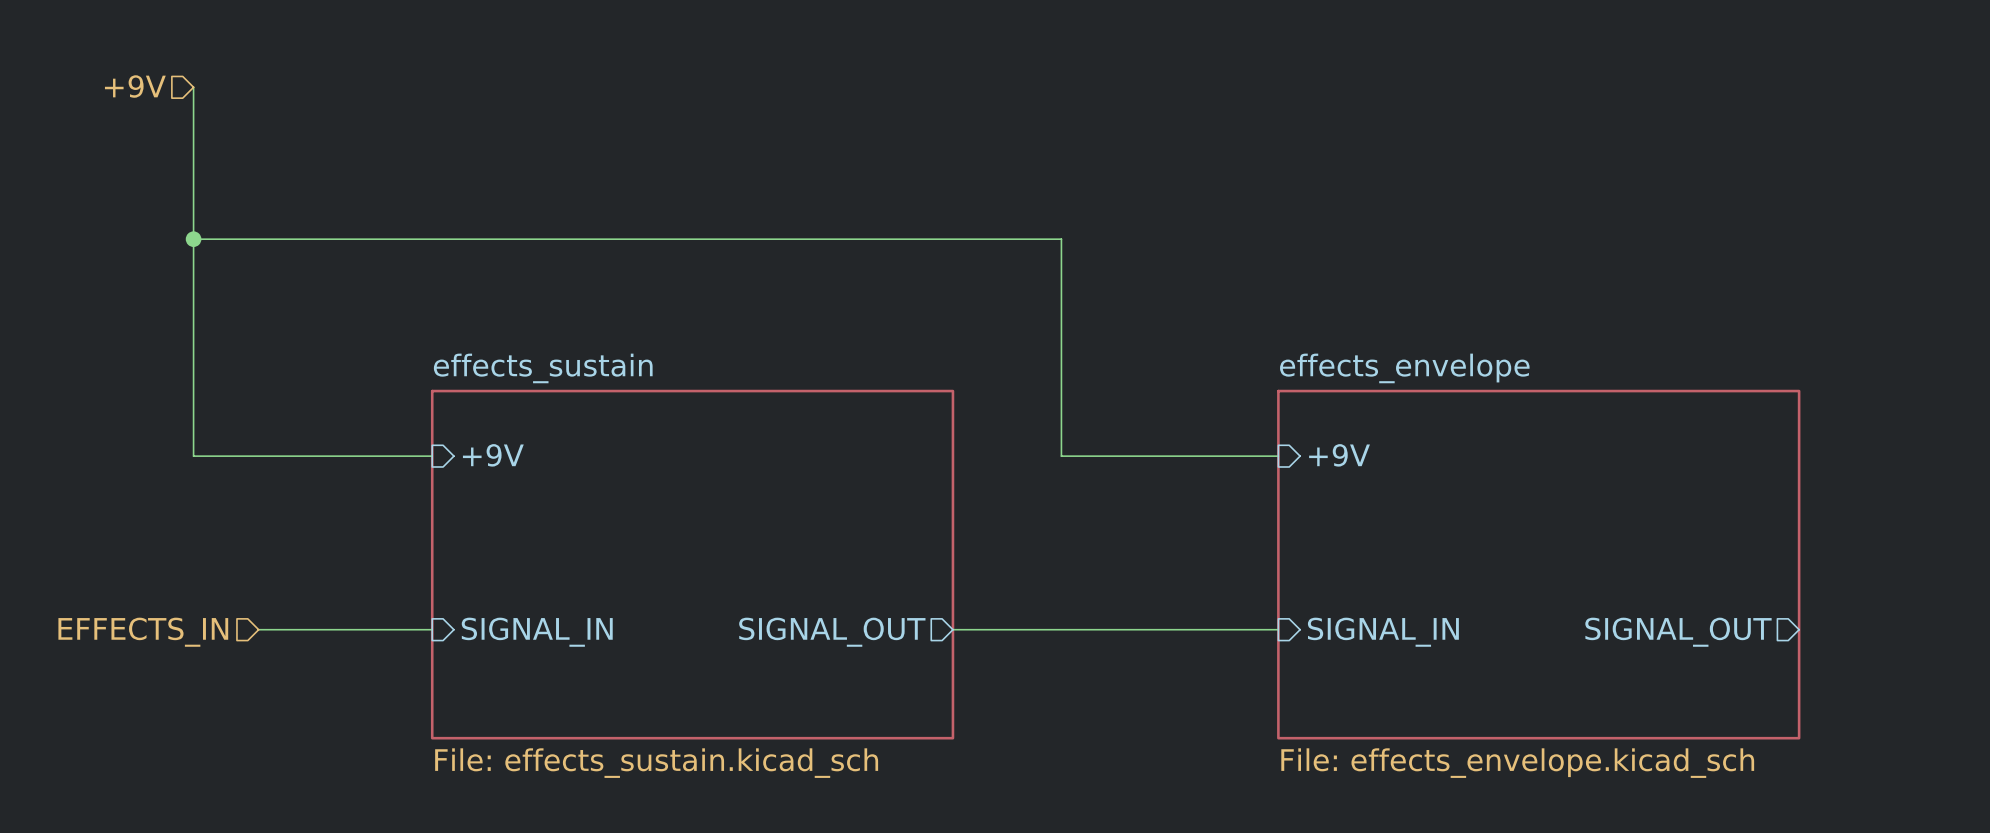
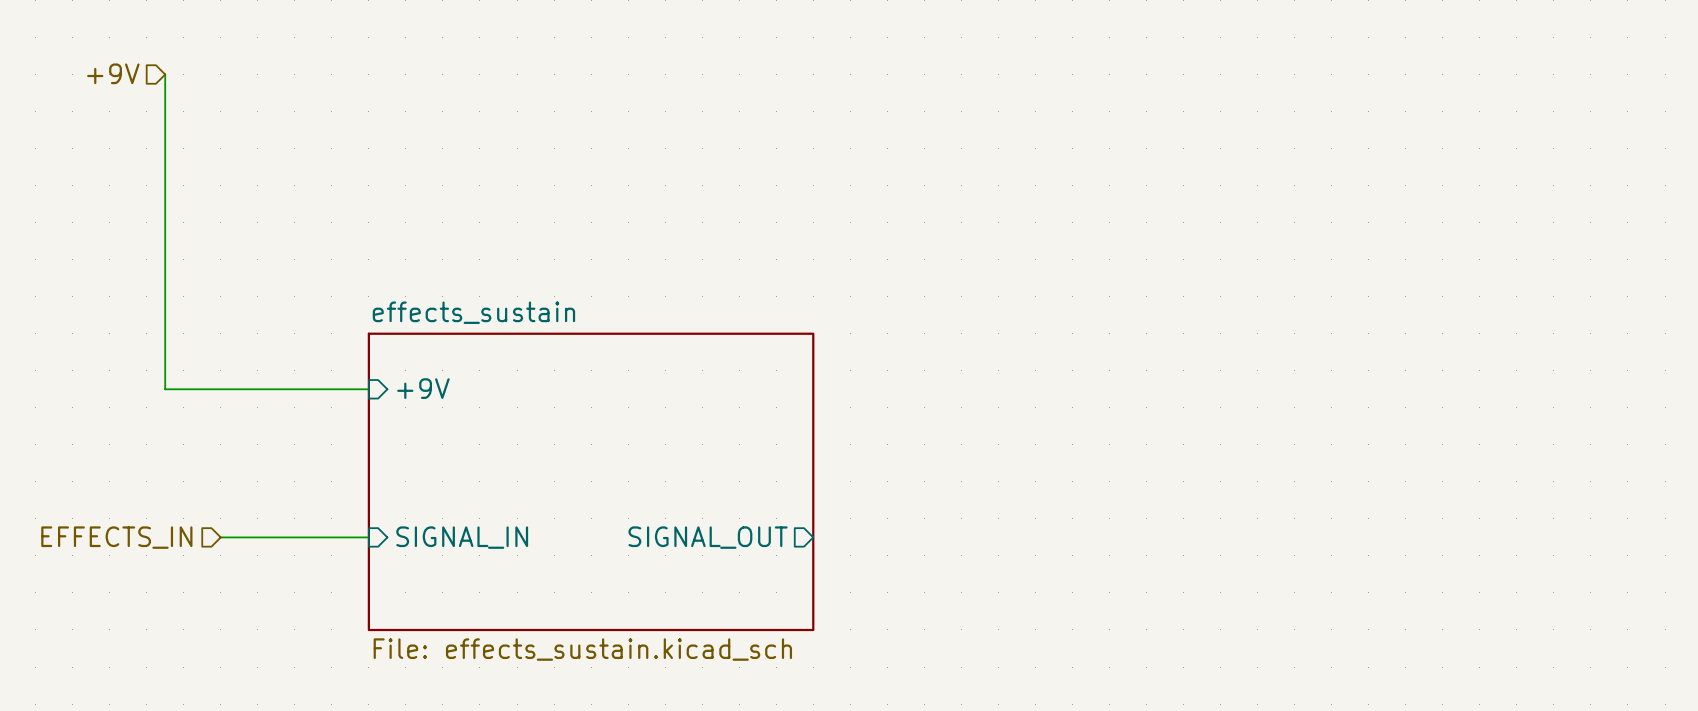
wire: (193, 239) (1061, 239) (1061, 456) (1278, 456) -> none
junction: (193, 239) -> none
sheet pin: +9V (1339, 455) -> none
sheet effects_envelope: File: effects_envelope.kicad_sch (1538, 564) -> none
wire: (952, 629) (1278, 629) -> none
sheet pin: SIGNAL_IN (1383, 632) -> none
sheet pin: SIGNAL_OUT (1678, 632) -> none

